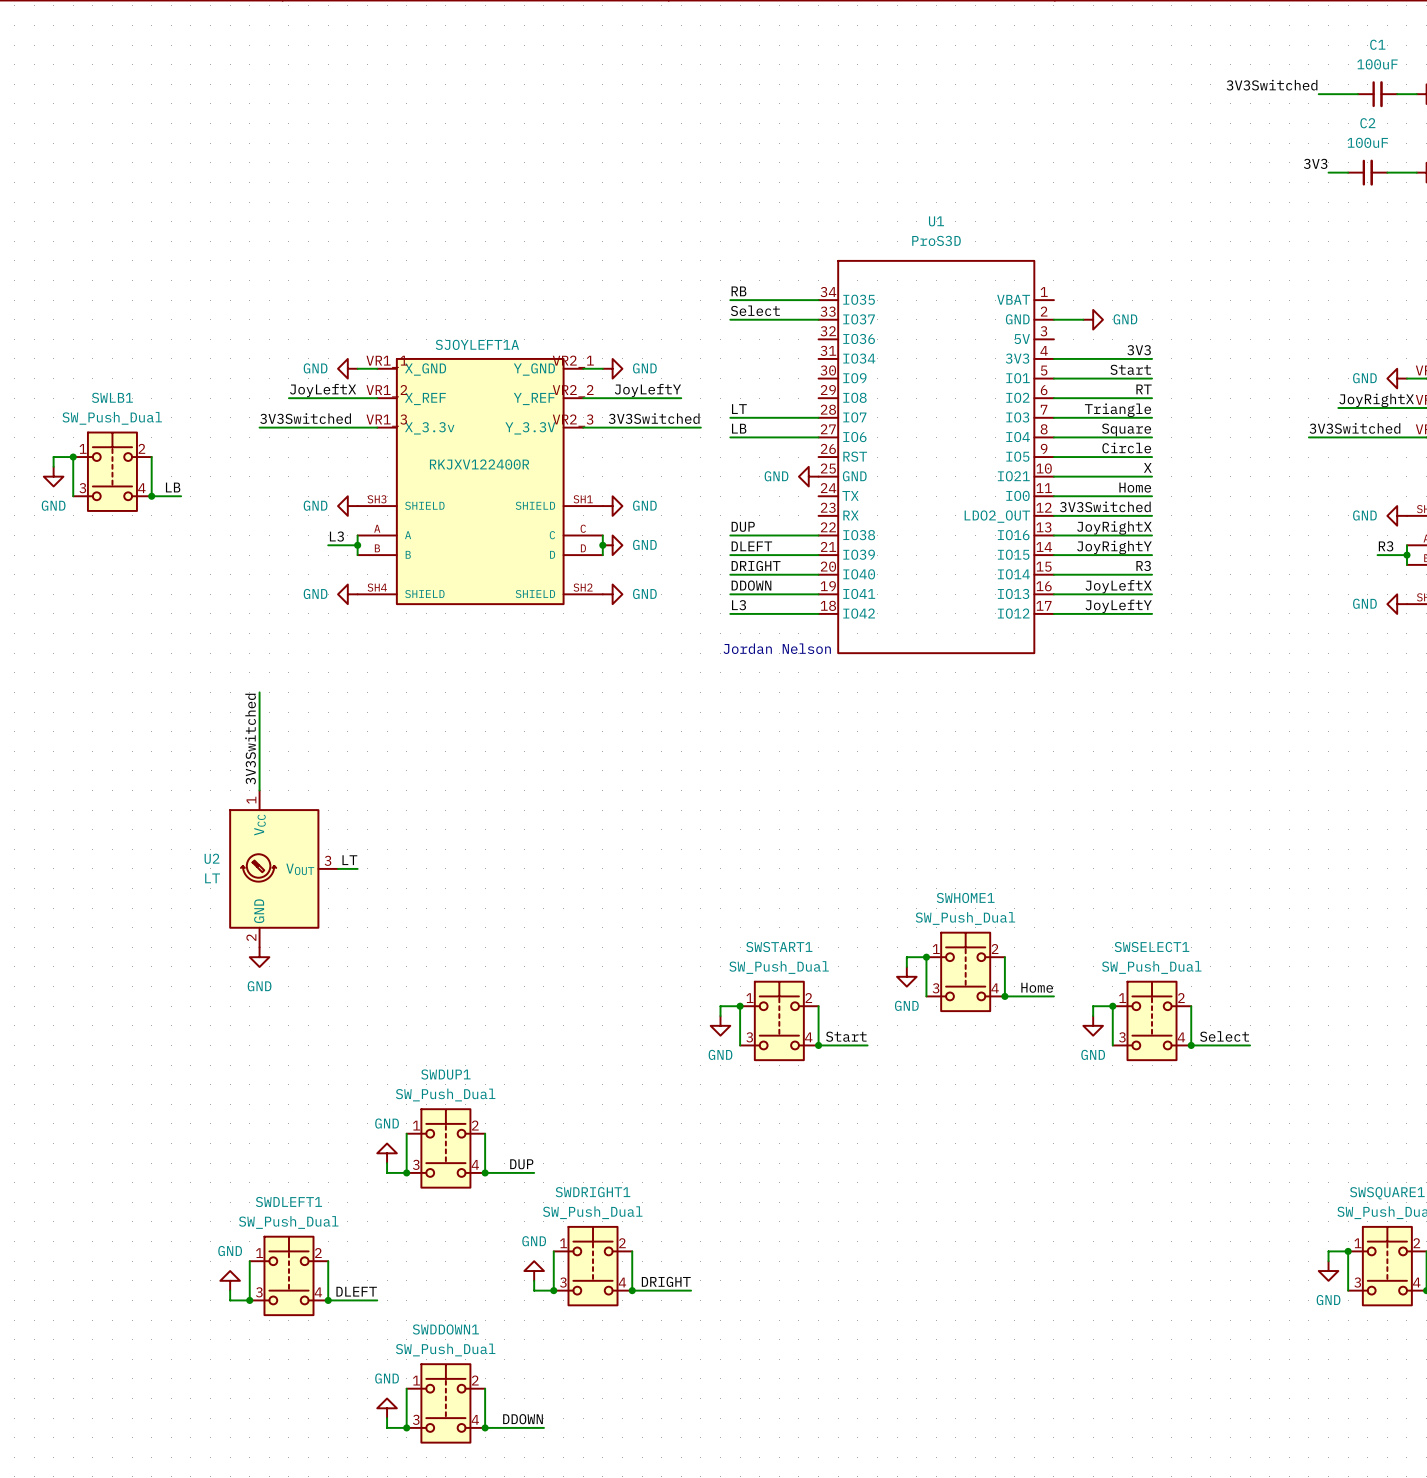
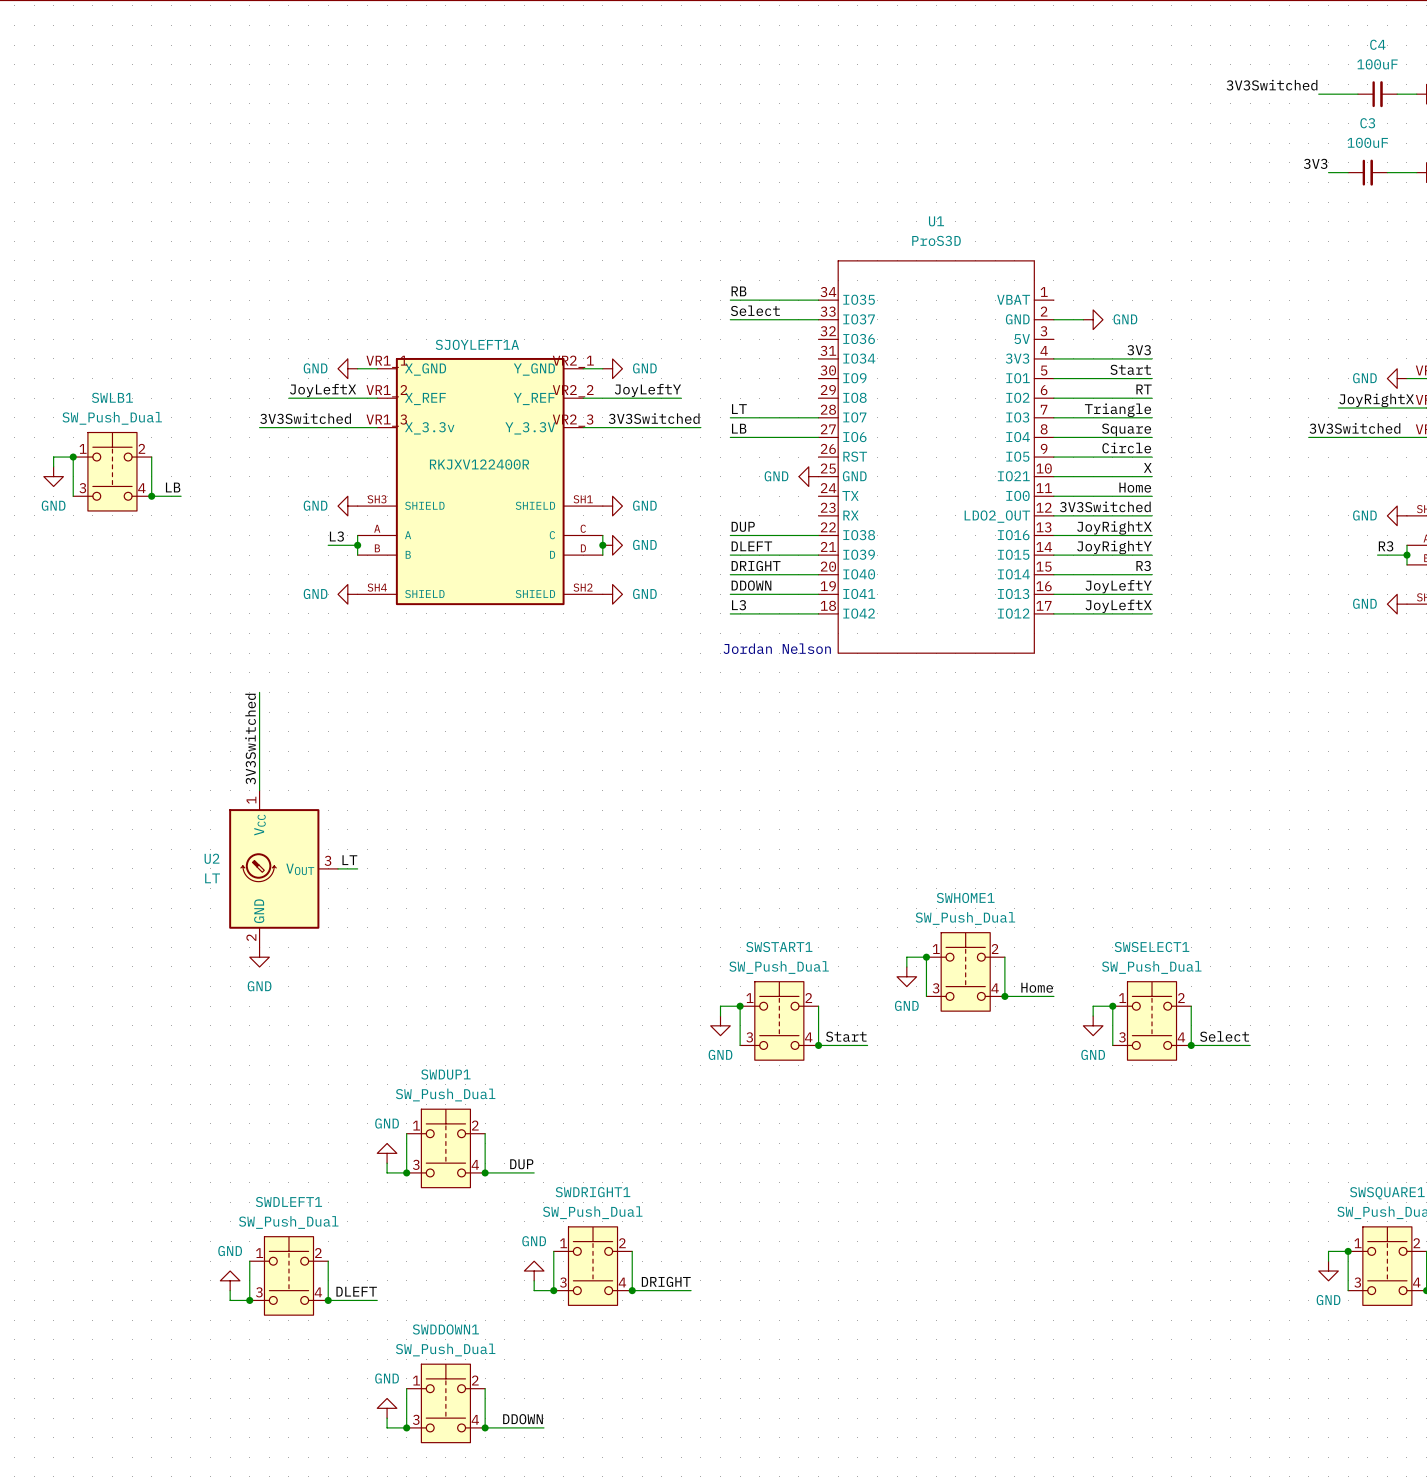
C1 name: C1 (1377, 44) -> C4 (1377, 44)
C2 name: C2 (1367, 123) -> C3 (1367, 123)
label: JoyLeftX (1118, 586) -> JoyLeftY (1118, 586)
label: JoyLeftY (1118, 606) -> JoyLeftX (1118, 606)

